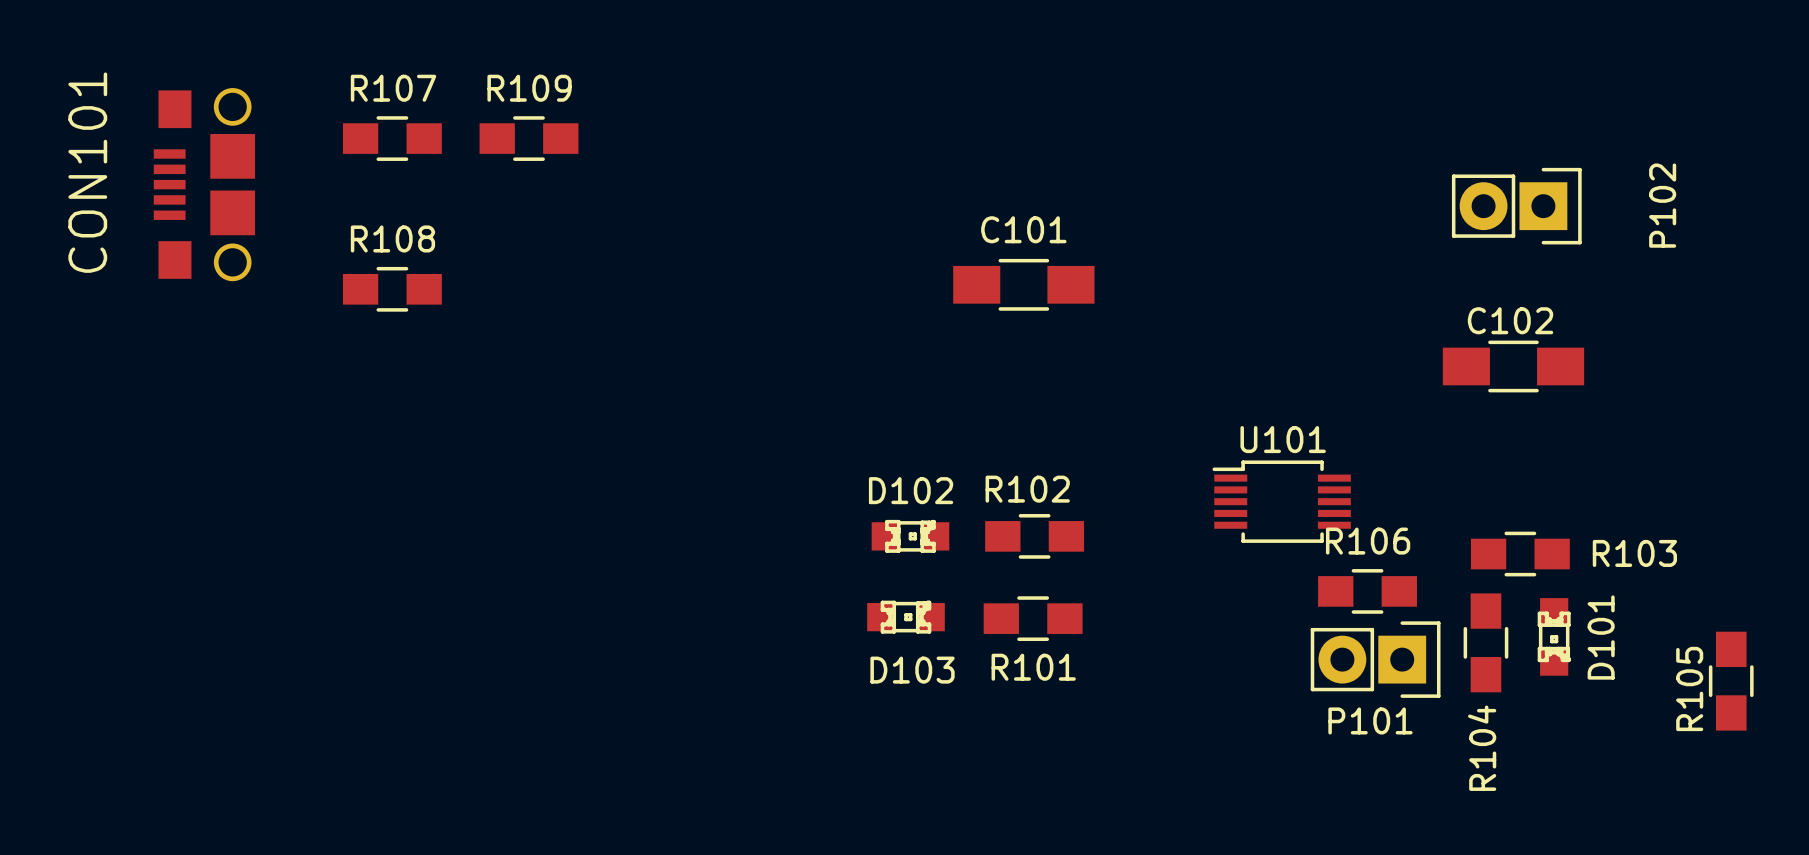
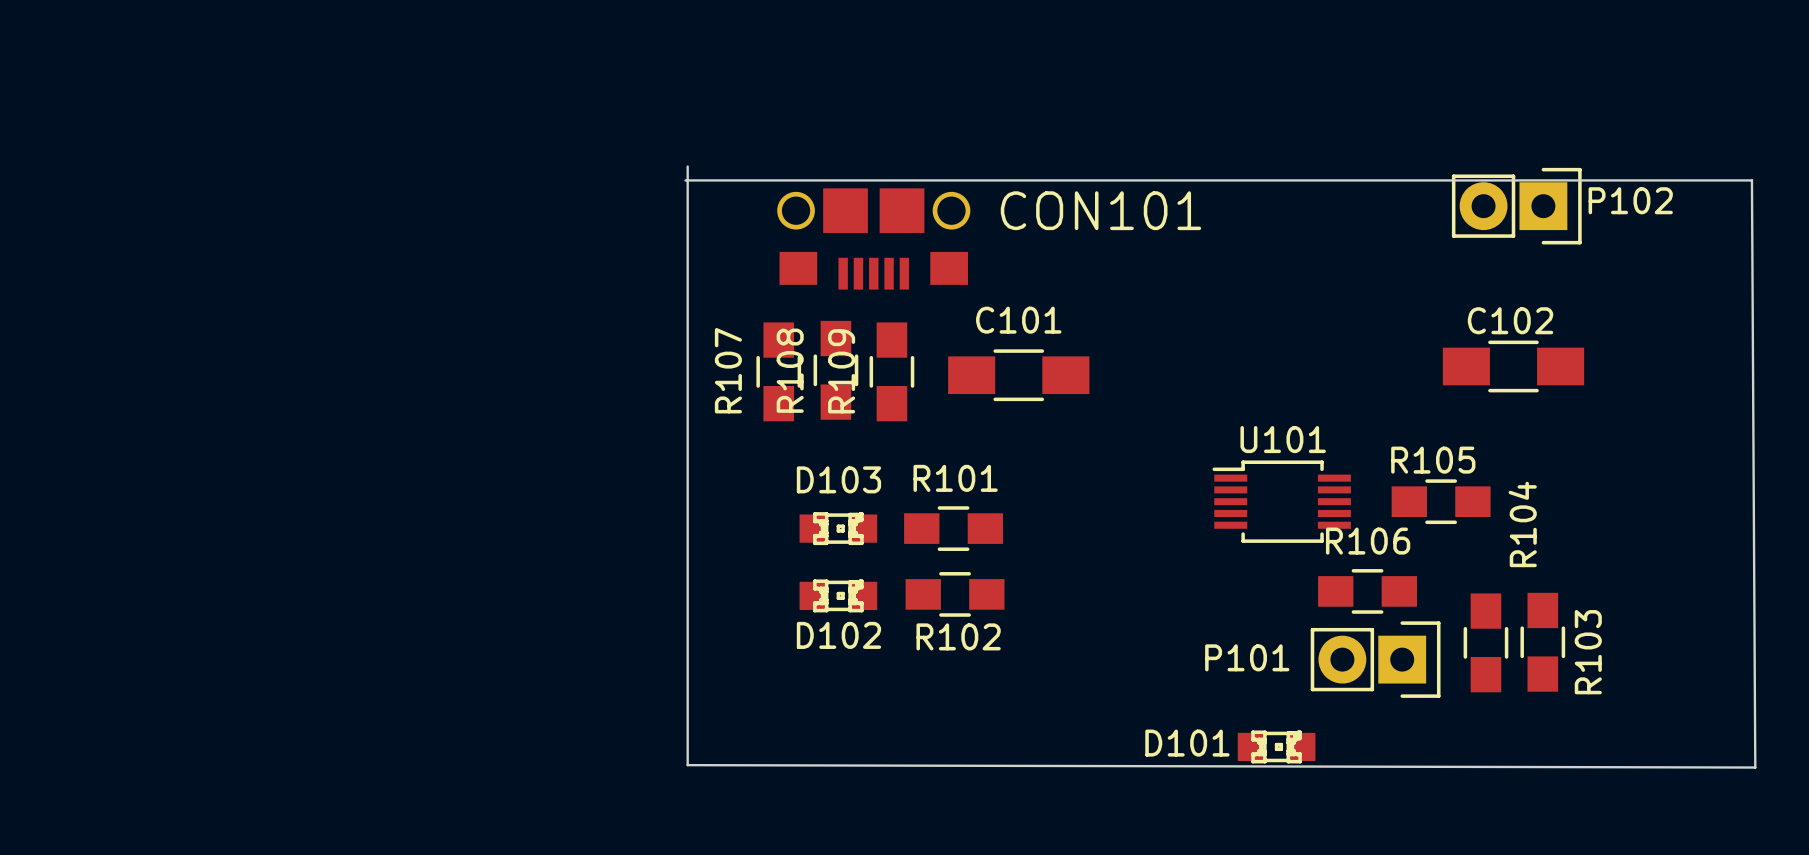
R107 name position: R107 (393, 88) -> R107 (728, 370)
R109 name position: R109 (529, 88) -> R109 (841, 371)
R107 rotation: 0° (392, 138) -> 90° clockwise (778, 371)
R107 position: (392, 138) -> (778, 371)
R109 rotation: 0° (528, 138) -> 90° clockwise (891, 371)
R109 position: (528, 138) -> (891, 371)
board edge: none -> (687, 166) (687, 765) (1755, 767) (1751, 180) (685, 180)
CON101 name position: CON101 (87, 172) -> CON101 (1100, 210)
CON101 rotation: 0° (204, 184) -> 90° counterclockwise (873, 238)
CON101 position: (204, 184) -> (873, 238)
P102 name rotation: 0° (1662, 205) -> 90° clockwise (1630, 200)
R108 name position: R108 (392, 238) -> R108 (790, 370)
C101 position: (1023, 284) -> (1018, 375)
R108 rotation: 0° (392, 289) -> 90° clockwise (835, 370)
R108 position: (392, 289) -> (835, 370)
R102 name position: R102 (1027, 489) -> R102 (958, 636)
D102 name position: D102 (911, 490) -> D102 (838, 635)
D102 position: (910, 536) -> (838, 595)
R102 position: (1034, 536) -> (955, 594)
R103 name position: R103 (1634, 553) -> R103 (1588, 652)
R103 rotation: 0° (1520, 554) -> 90° clockwise (1542, 642)
R103 position: (1520, 554) -> (1542, 642)
D103 position: (905, 617) -> (838, 528)
R101 position: (1033, 618) -> (953, 528)
D101 rotation: 0° (1554, 636) -> 90° counterclockwise (1276, 746)
D101 position: (1554, 636) -> (1276, 746)
D101 name position: D101 (1601, 637) -> D101 (1187, 743)
R101 name position: R101 (1033, 667) -> R101 (955, 478)
D103 name position: D103 (912, 670) -> D103 (838, 479)
R105 rotation: 0° (1731, 681) -> 90° clockwise (1441, 501)
R105 position: (1731, 681) -> (1441, 501)
P101 name position: P101 (1370, 720) -> P101 (1247, 657)
R104 name position: R104 (1482, 748) -> R104 (1522, 524)

